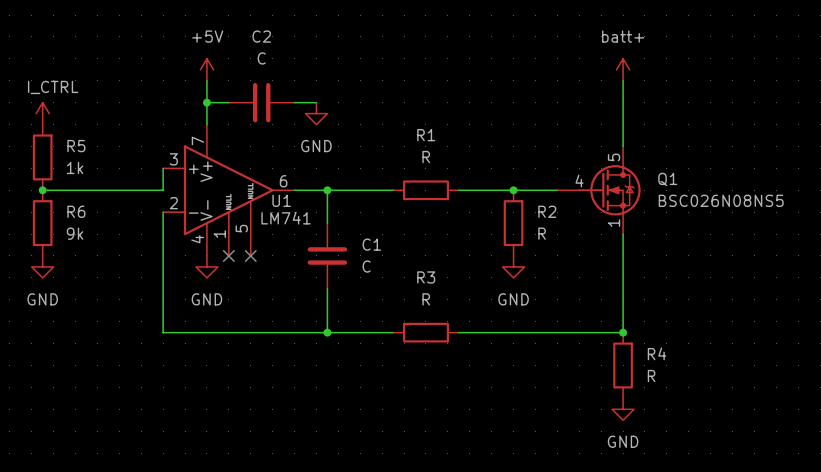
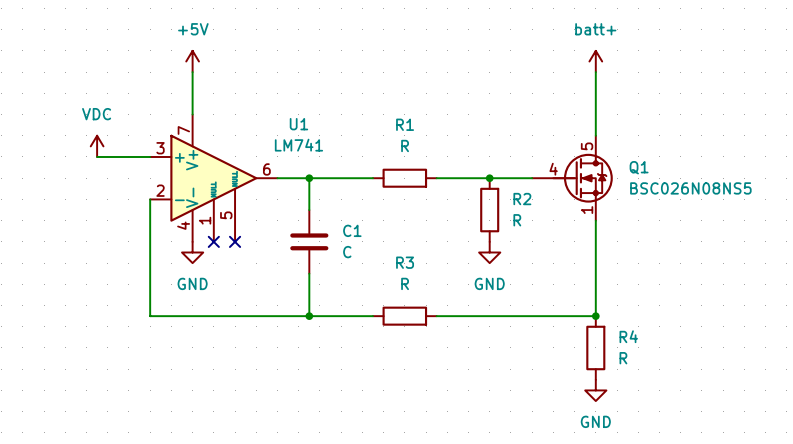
wire: (206, 102) (228, 102) -> none
junction: (206, 102) -> none
C2: C (261, 102) -> none
wire: (294, 102) (316, 102) -> none
power symbol: I_CTRL (42, 113) -> none
power symbol: GND (316, 113) -> none
R5: 1k (42, 157) -> none
power symbol: none -> VDC (97, 146)
wire: (163, 168) (163, 190) (42, 190) -> (150, 156) (97, 156)
junction: (42, 190) -> none
U1 name position: U1 (281, 200) -> U1 (298, 124)
U1 value position: LM741 (286, 218) -> LM741 (298, 145)
R6: 9k (42, 223) -> none
power symbol: GND (42, 266) -> none

